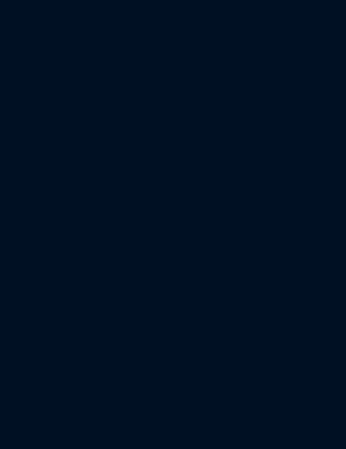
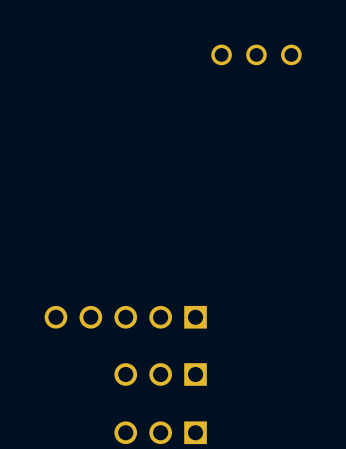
part: none -> (256, 54)
part: none -> (125, 317)
part: none -> (160, 374)
part: none -> (160, 432)

